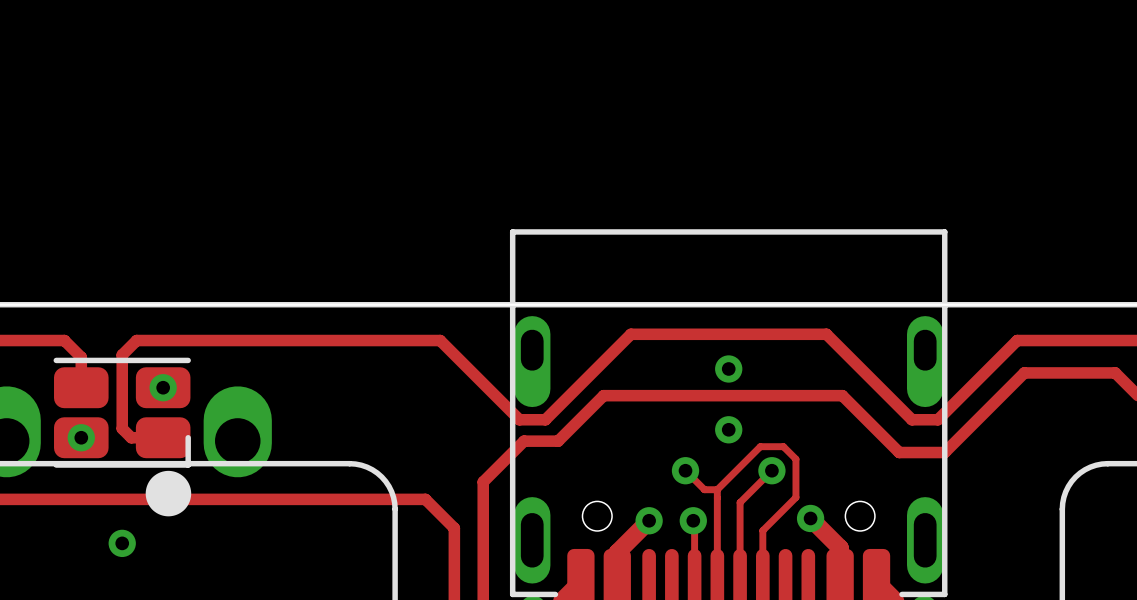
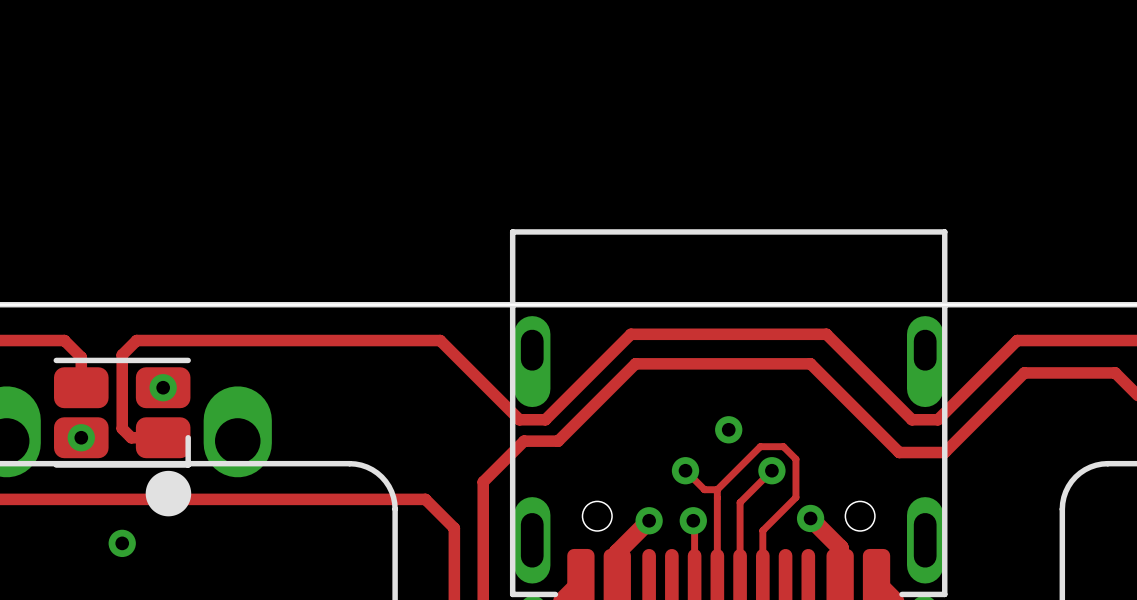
via: (728, 368) -> none
track: (603, 395) (842, 395) -> (603, 395) (635, 363) (810, 363) (842, 395)

